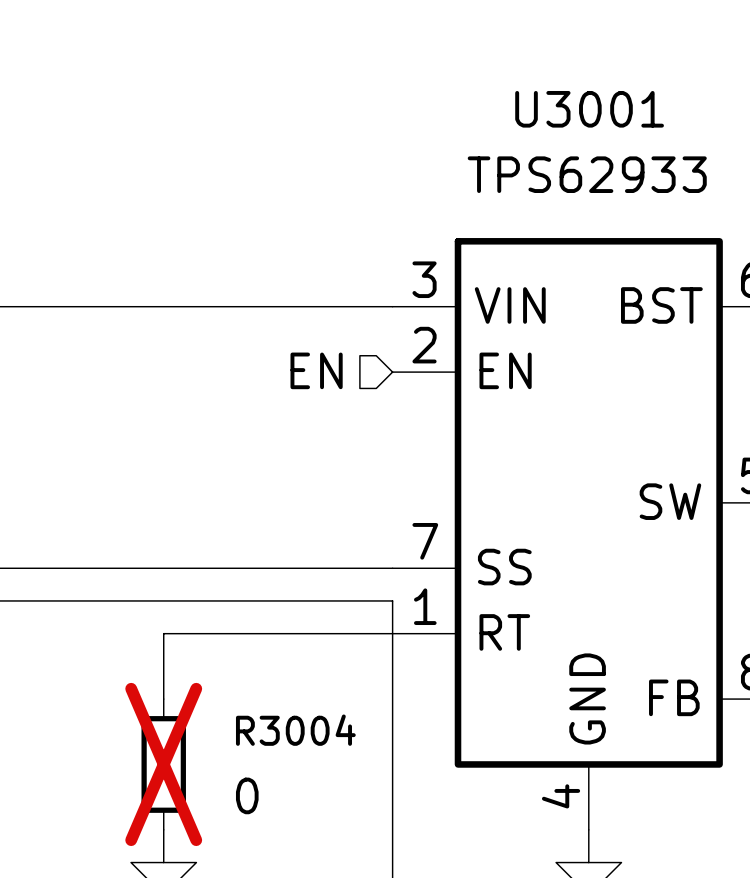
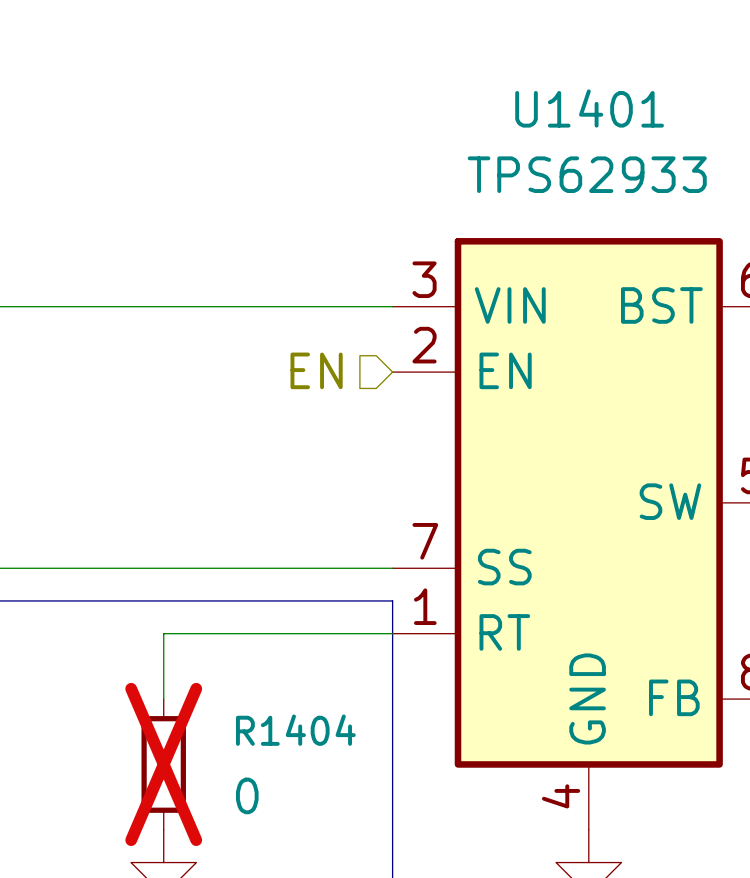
U3001 name: U3001 (589, 109) -> U1401 (589, 108)
R3004 name: R3004 (295, 730) -> R1404 (295, 730)

